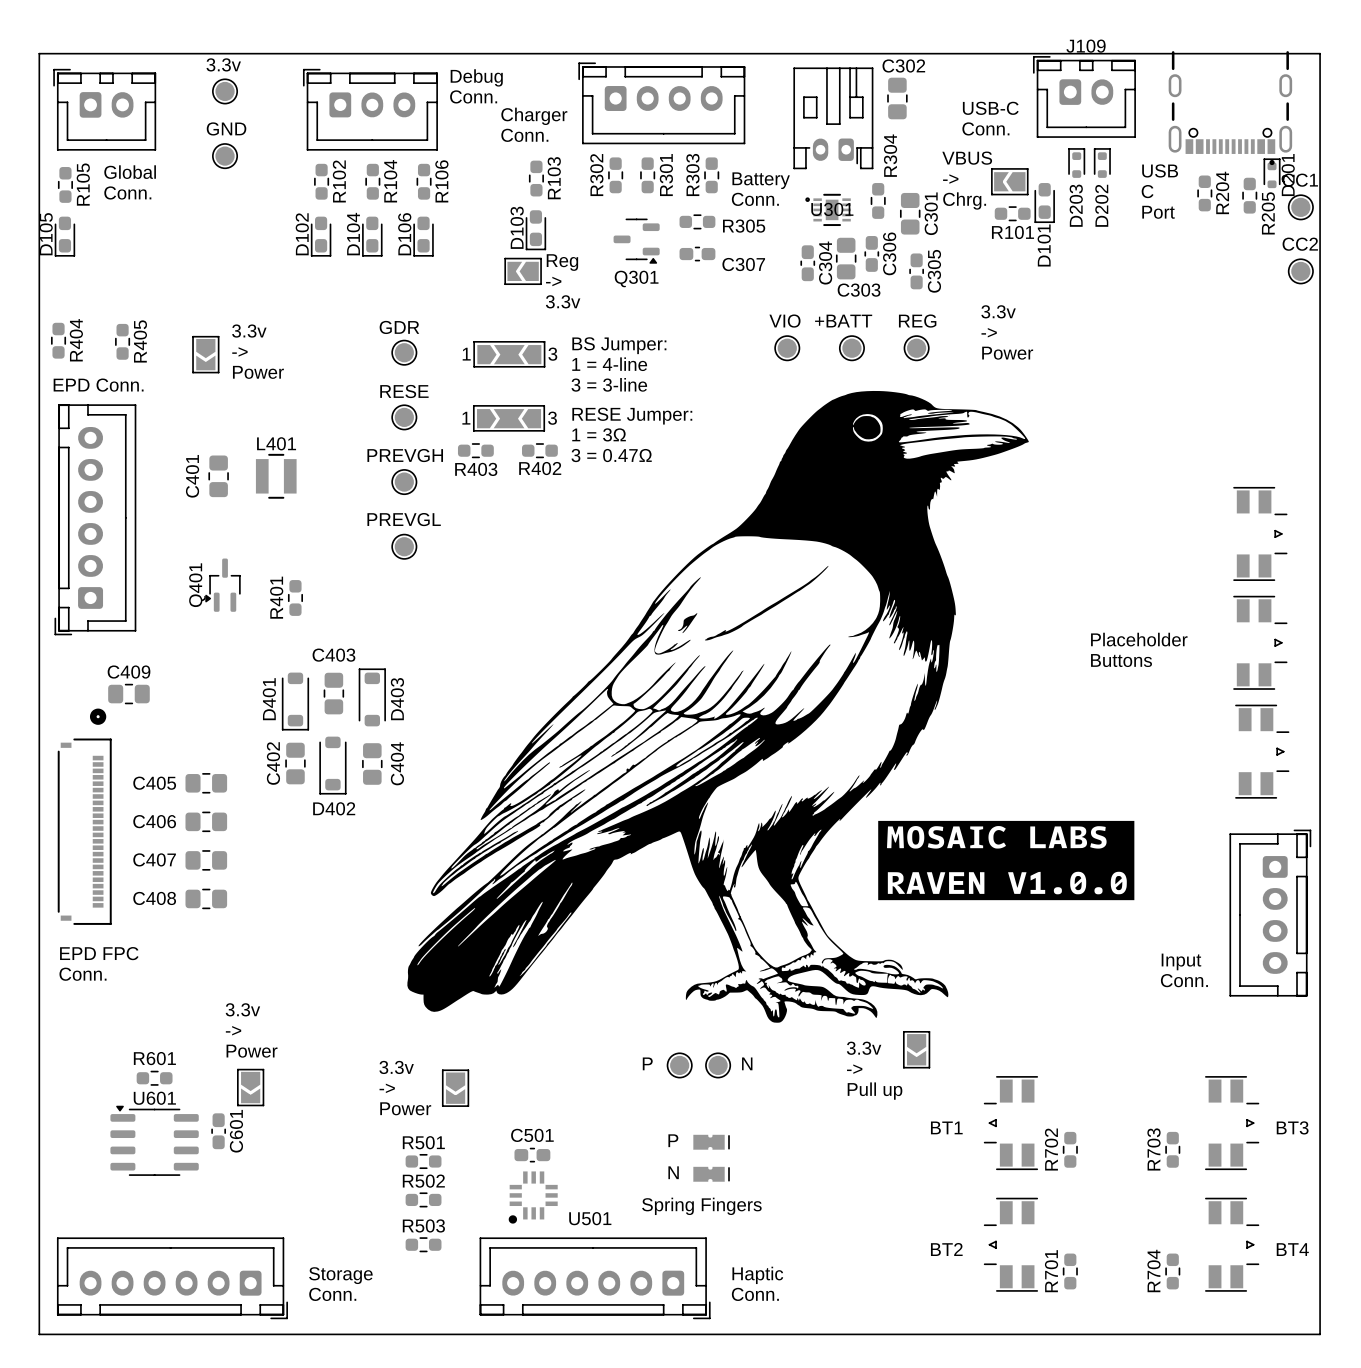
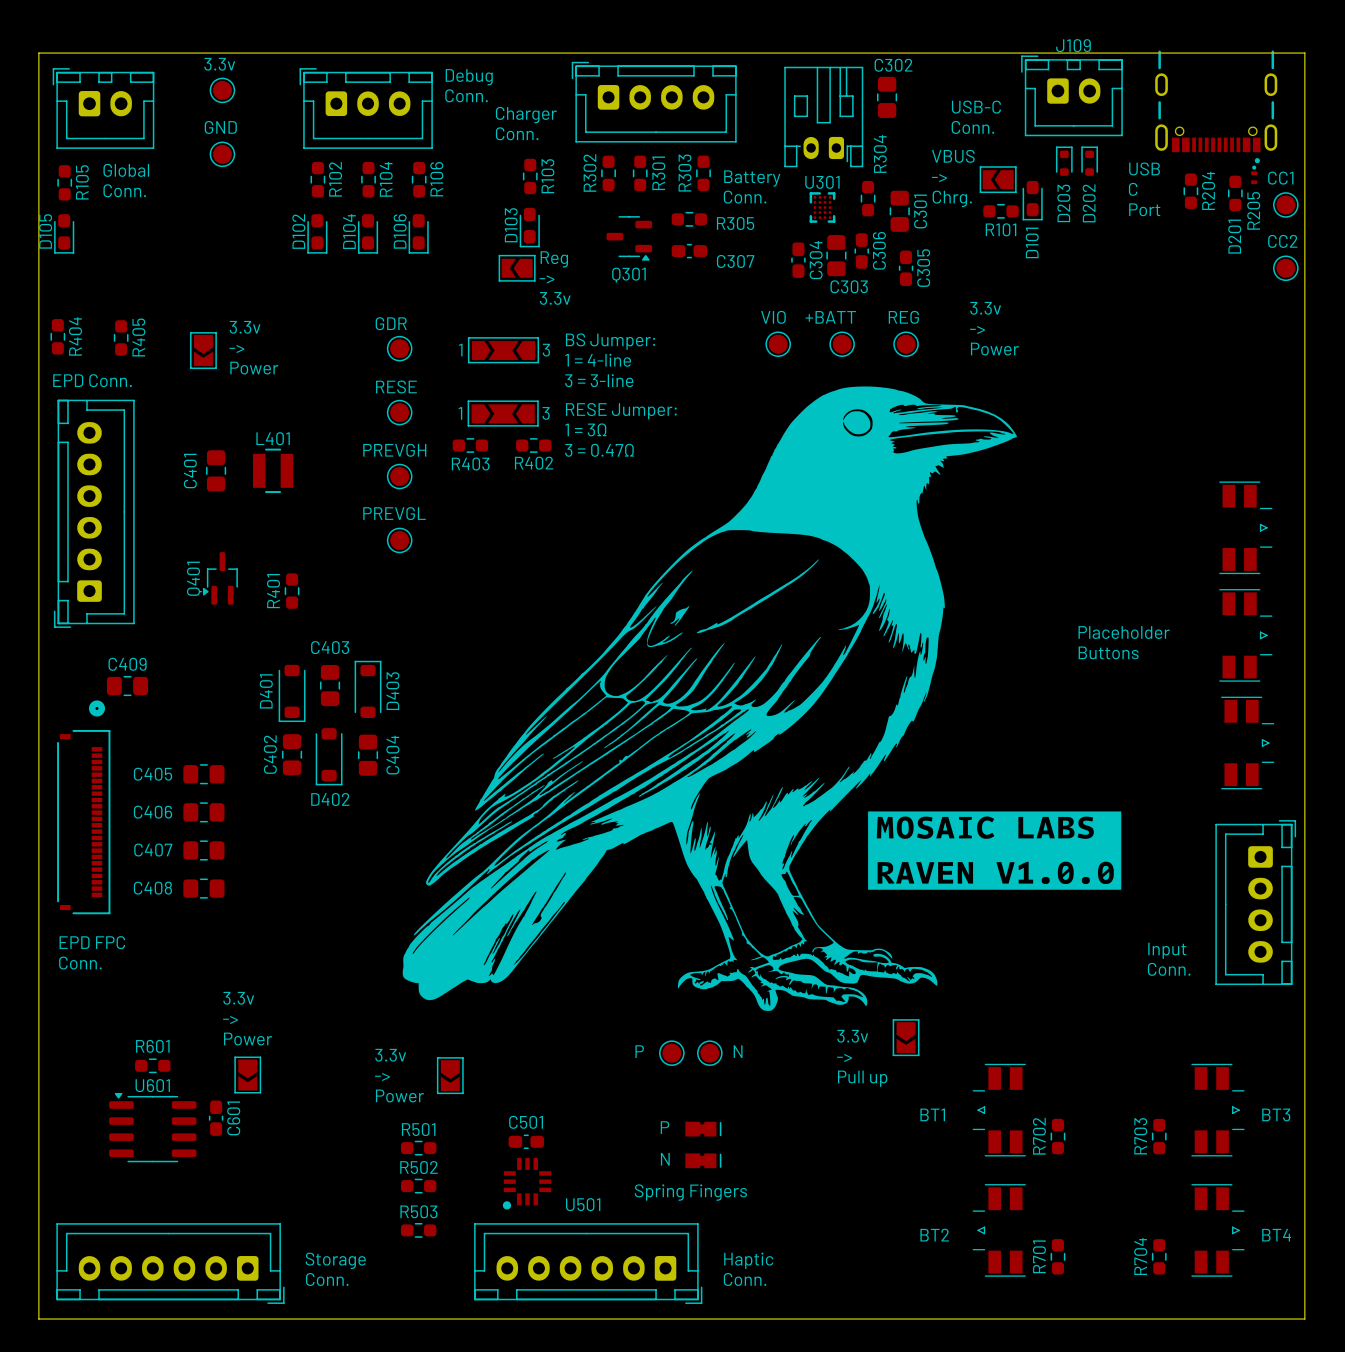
D201 footprint: [1263, 158, 1281, 189] -> [1251, 165, 1258, 185]
D201 name position: D201 (1288, 175) -> D201 (1234, 236)
U301 footprint: [805, 193, 851, 227] -> [809, 192, 836, 223]

